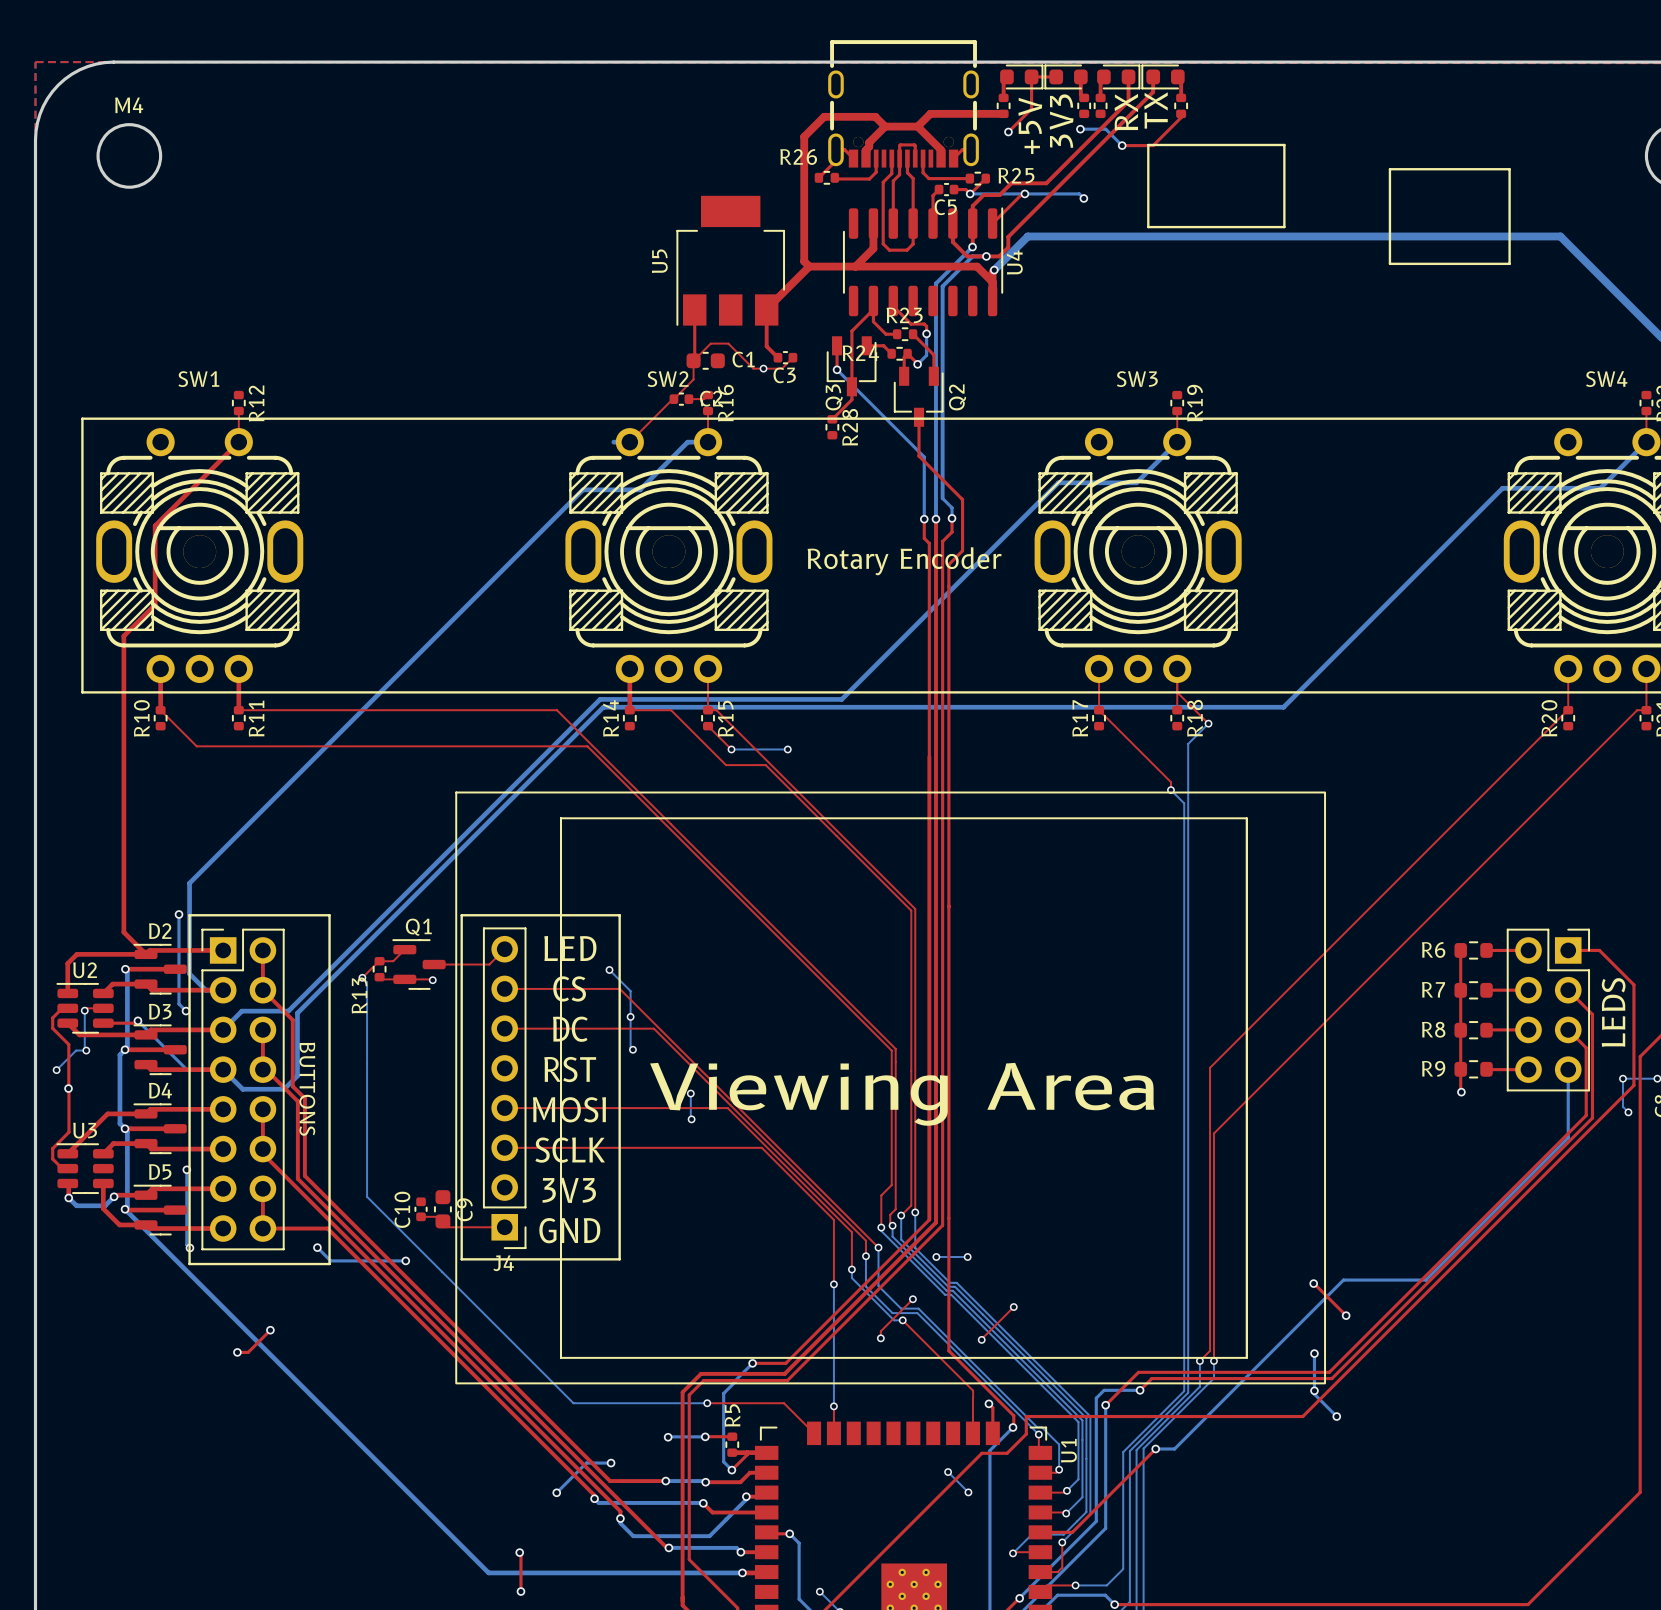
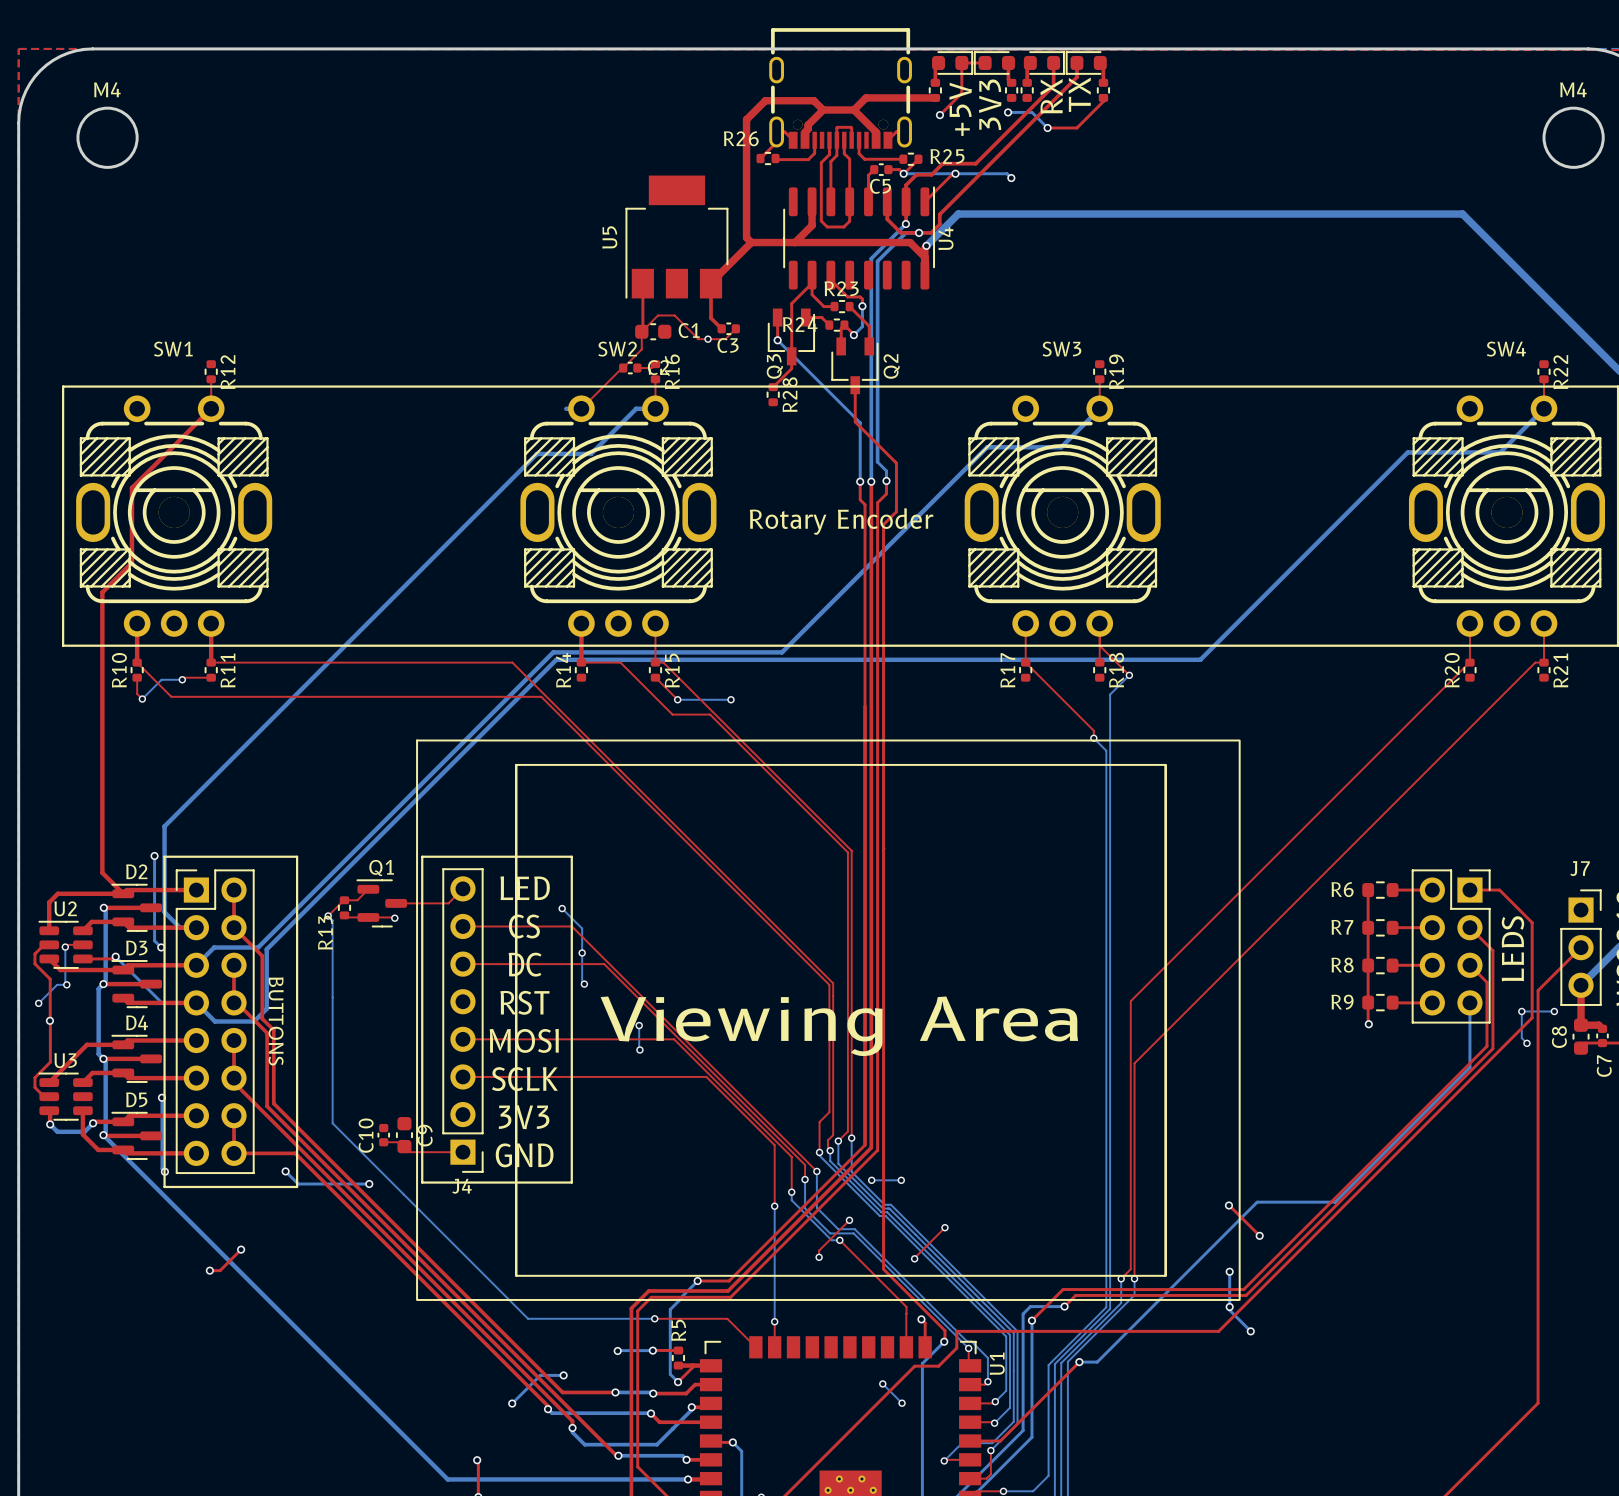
line: (1148, 144) (1284, 144) (1284, 227) (1148, 227) (1148, 144) -> none
line: (1389, 169) (1509, 169) (1509, 263) (1389, 263) (1389, 169) -> none
top track: none -> (137, 677) (137, 693) (142, 699)
top track: none -> (211, 677) (184, 677) (182, 679)
bottom track: none -> (182, 679) (161, 679) (142, 699)
via: none -> (182, 679)
via: none -> (142, 699)

